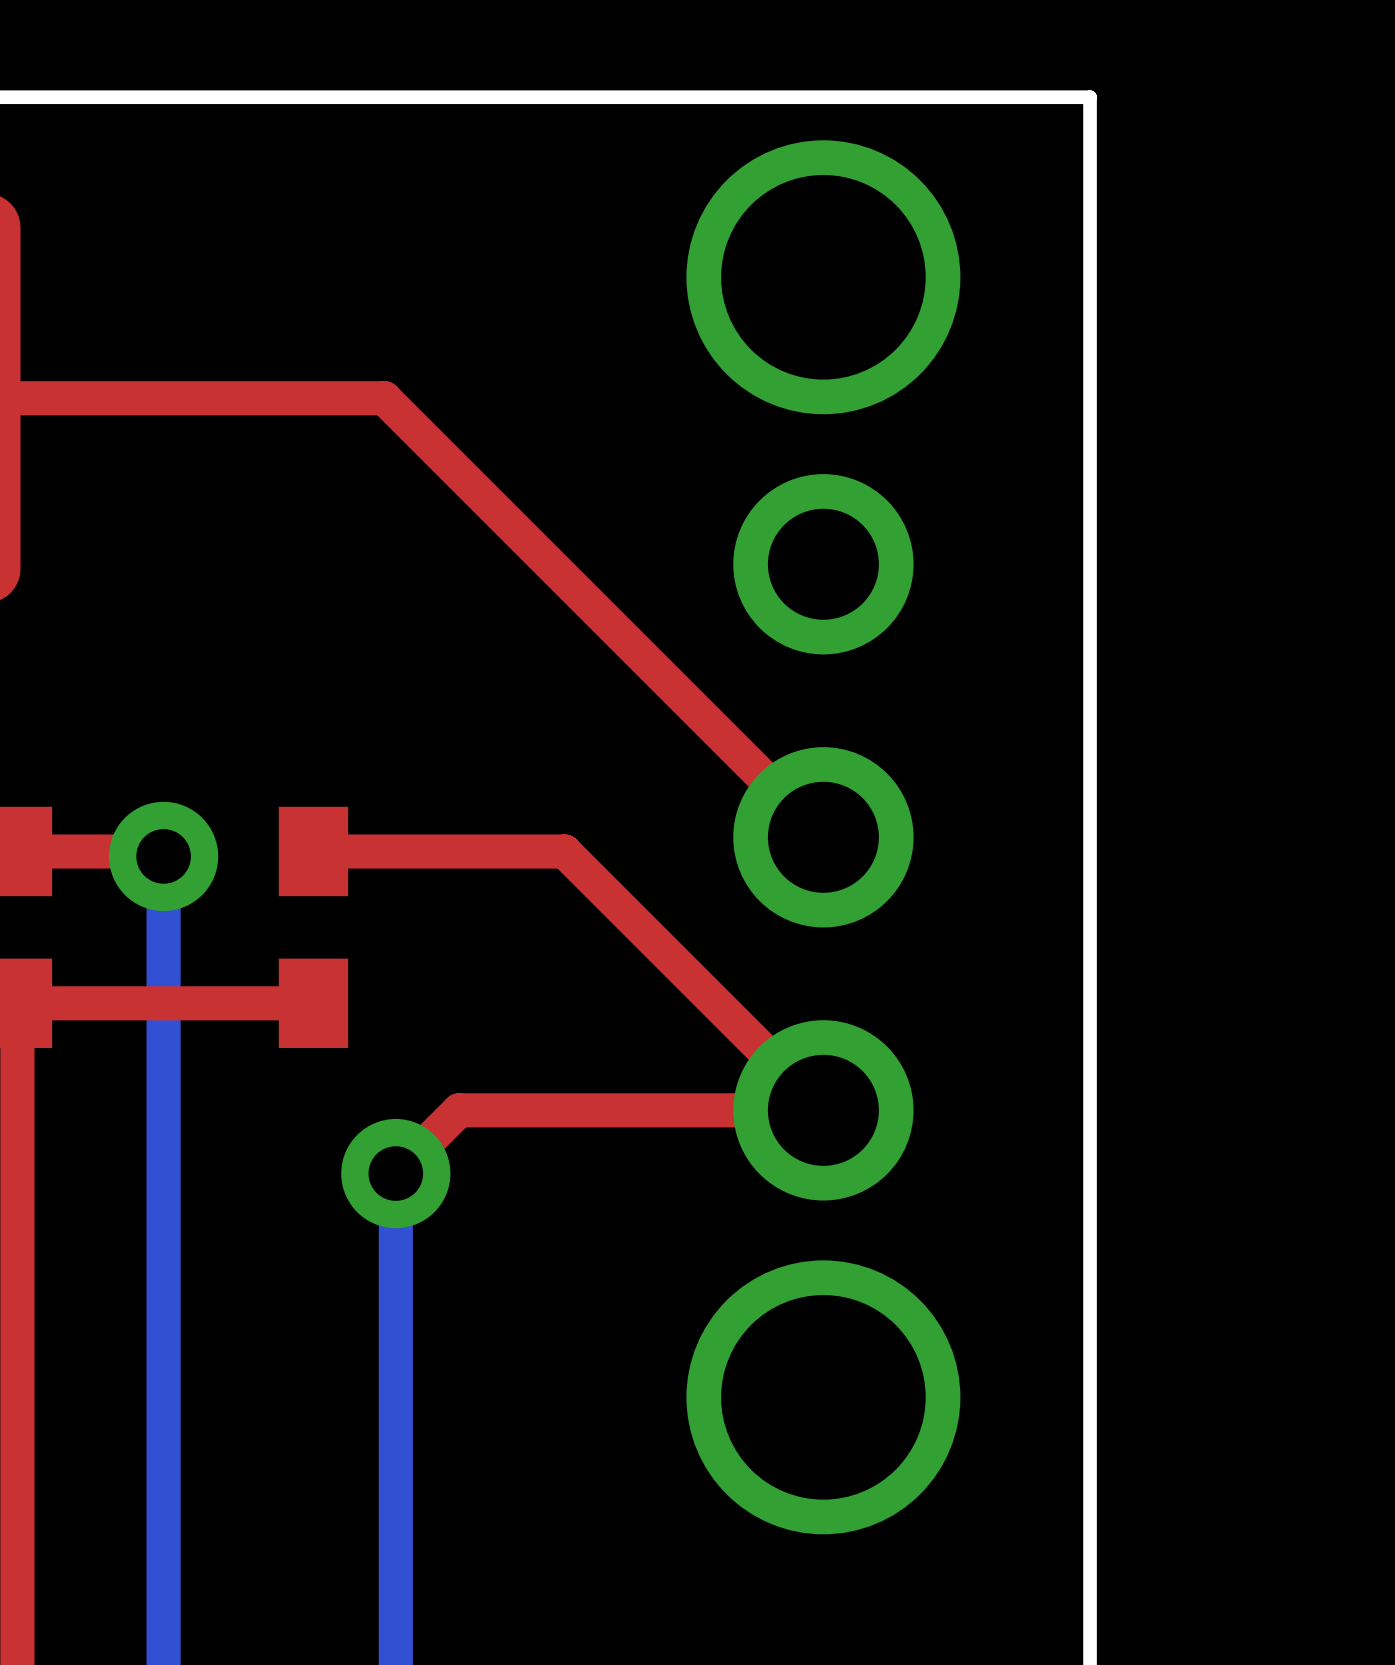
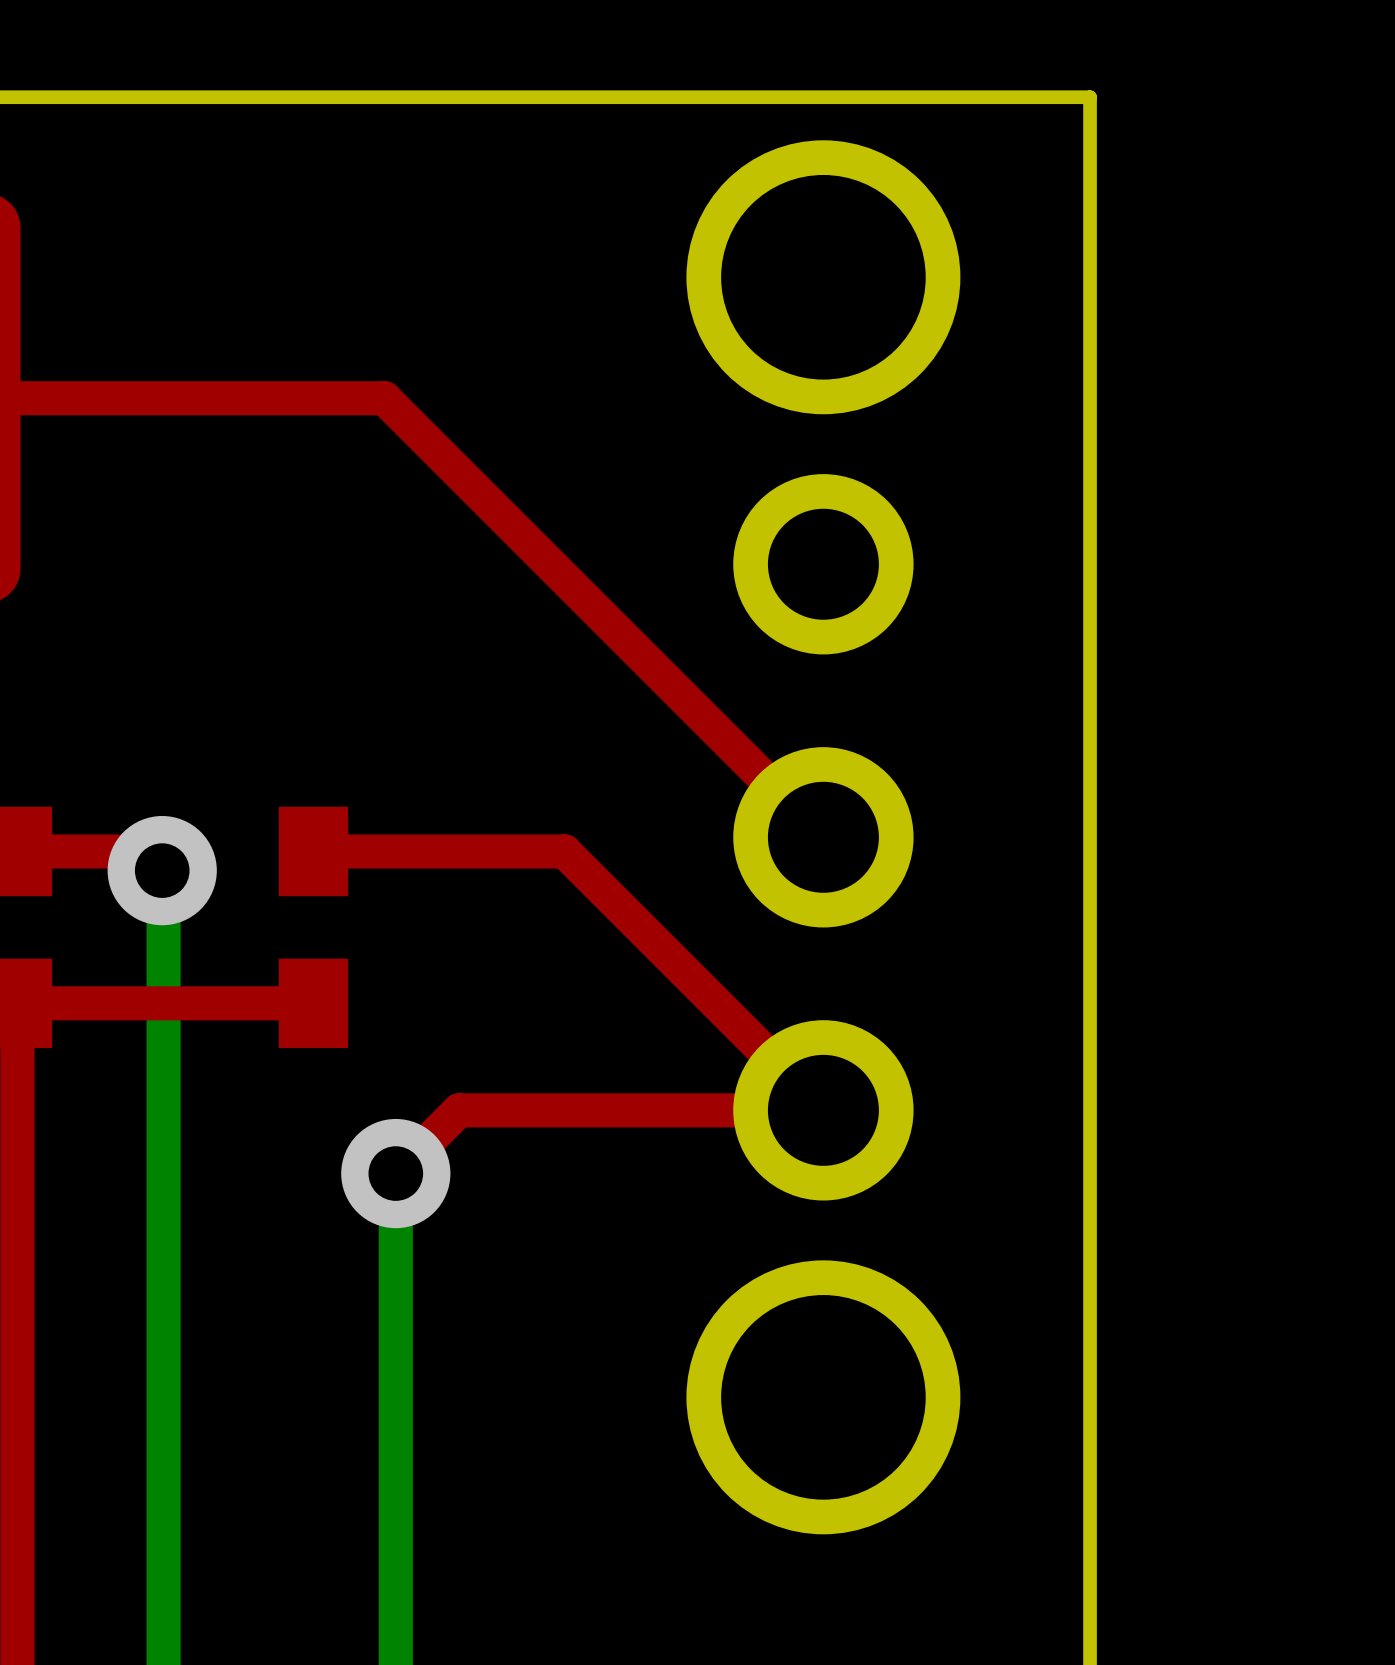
via position: (163, 856) -> (162, 870)

